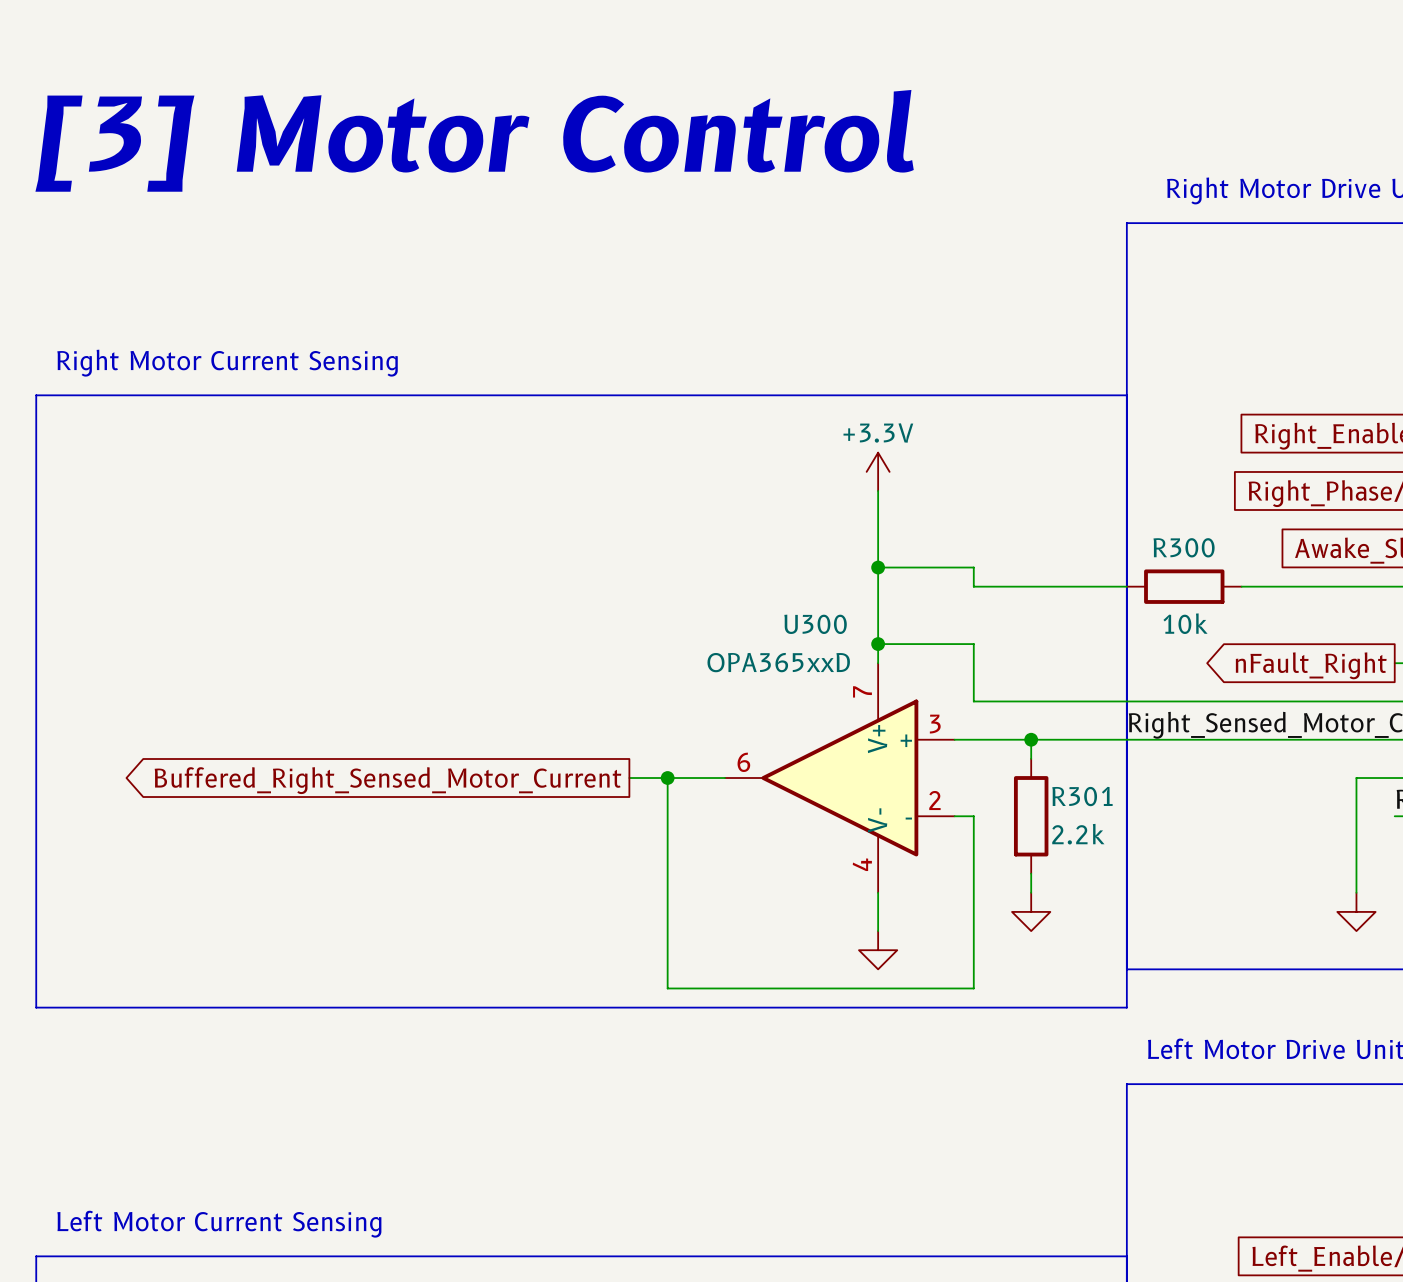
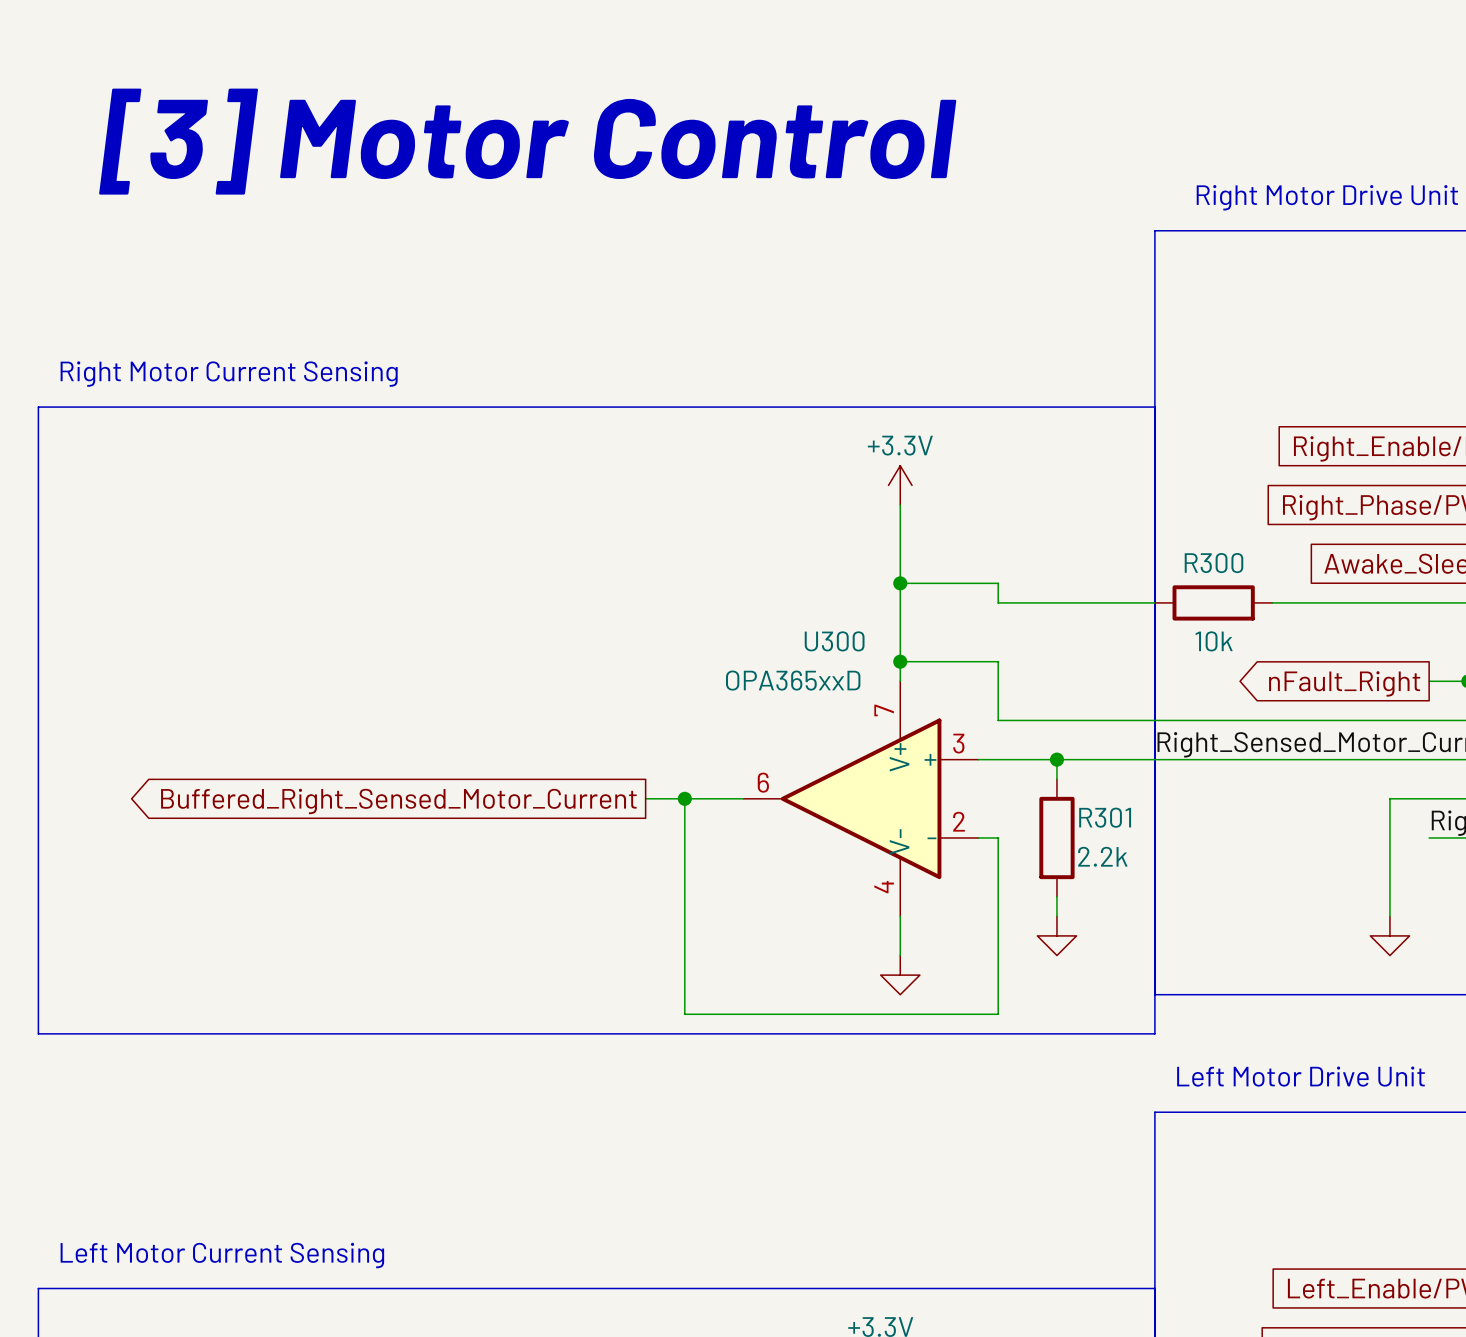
text position: [3] Motor Control (474, 140) -> [3] Motor Control (527, 141)

